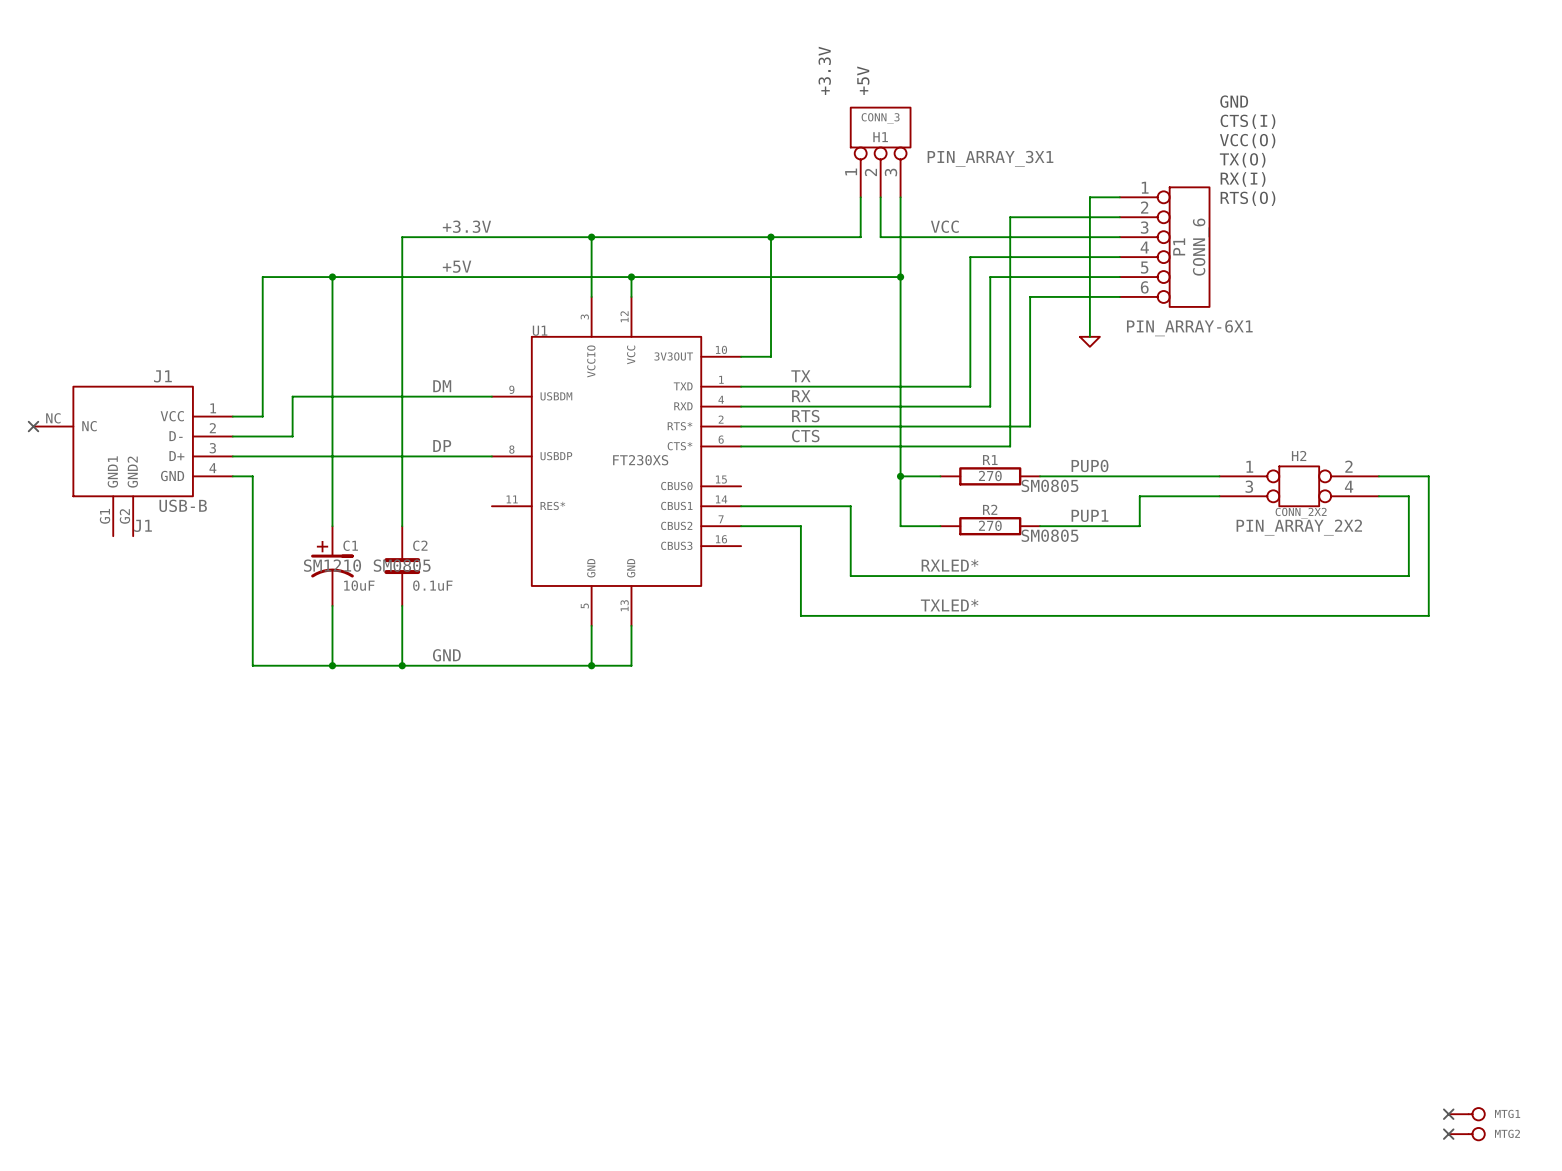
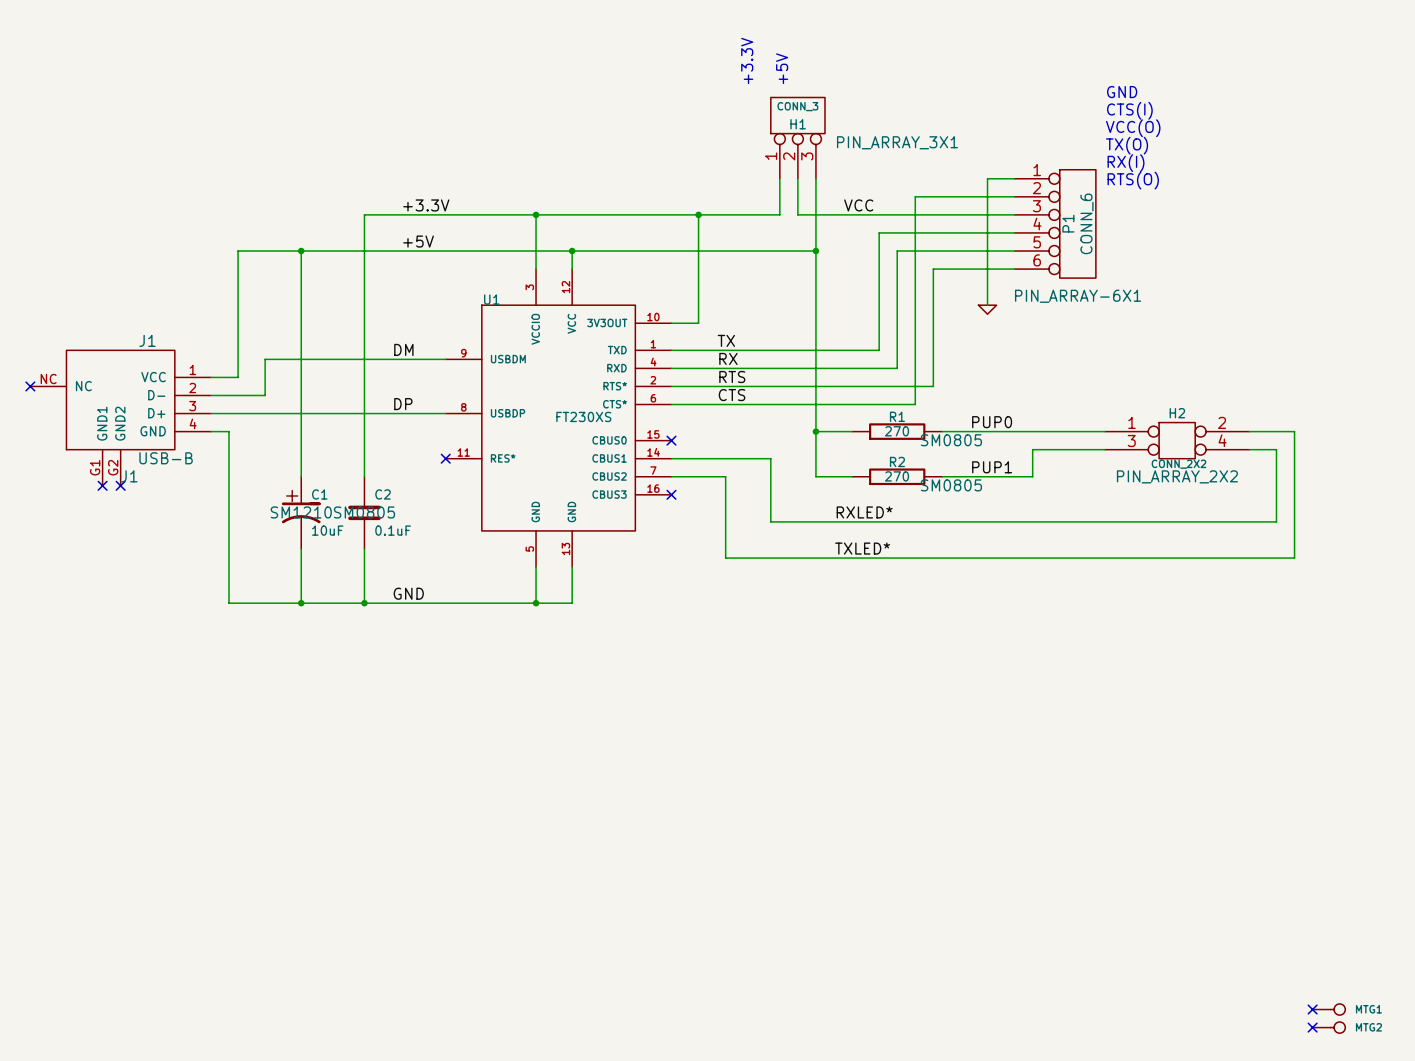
no-connect mark: none -> (671, 440)
no-connect mark: none -> (445, 458)
no-connect mark: none -> (102, 485)
no-connect mark: none -> (120, 485)
no-connect mark: none -> (671, 494)

